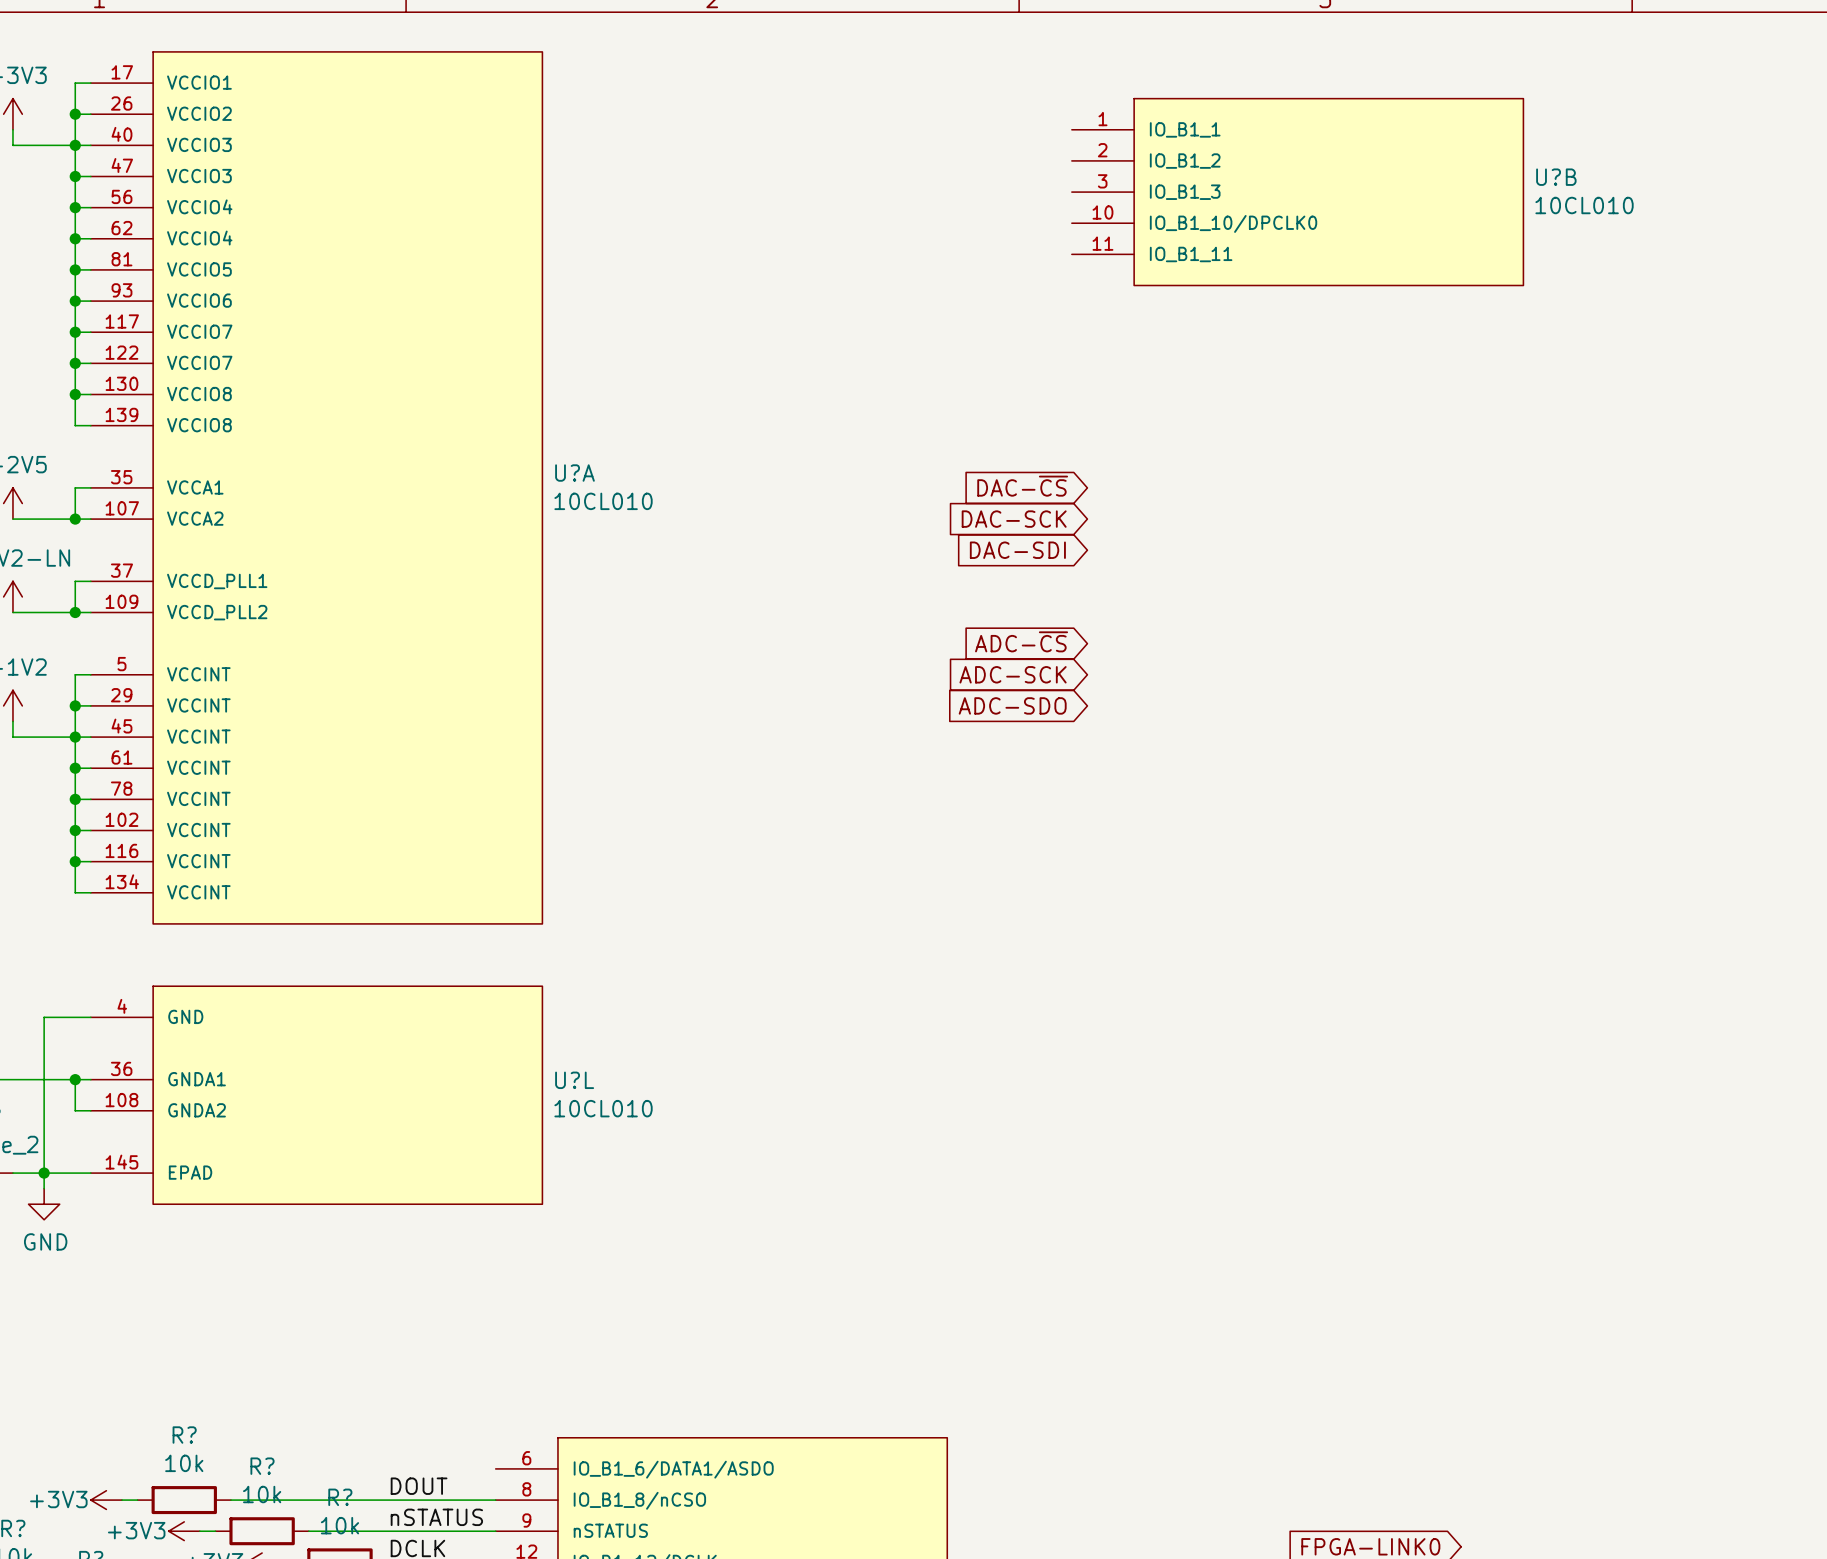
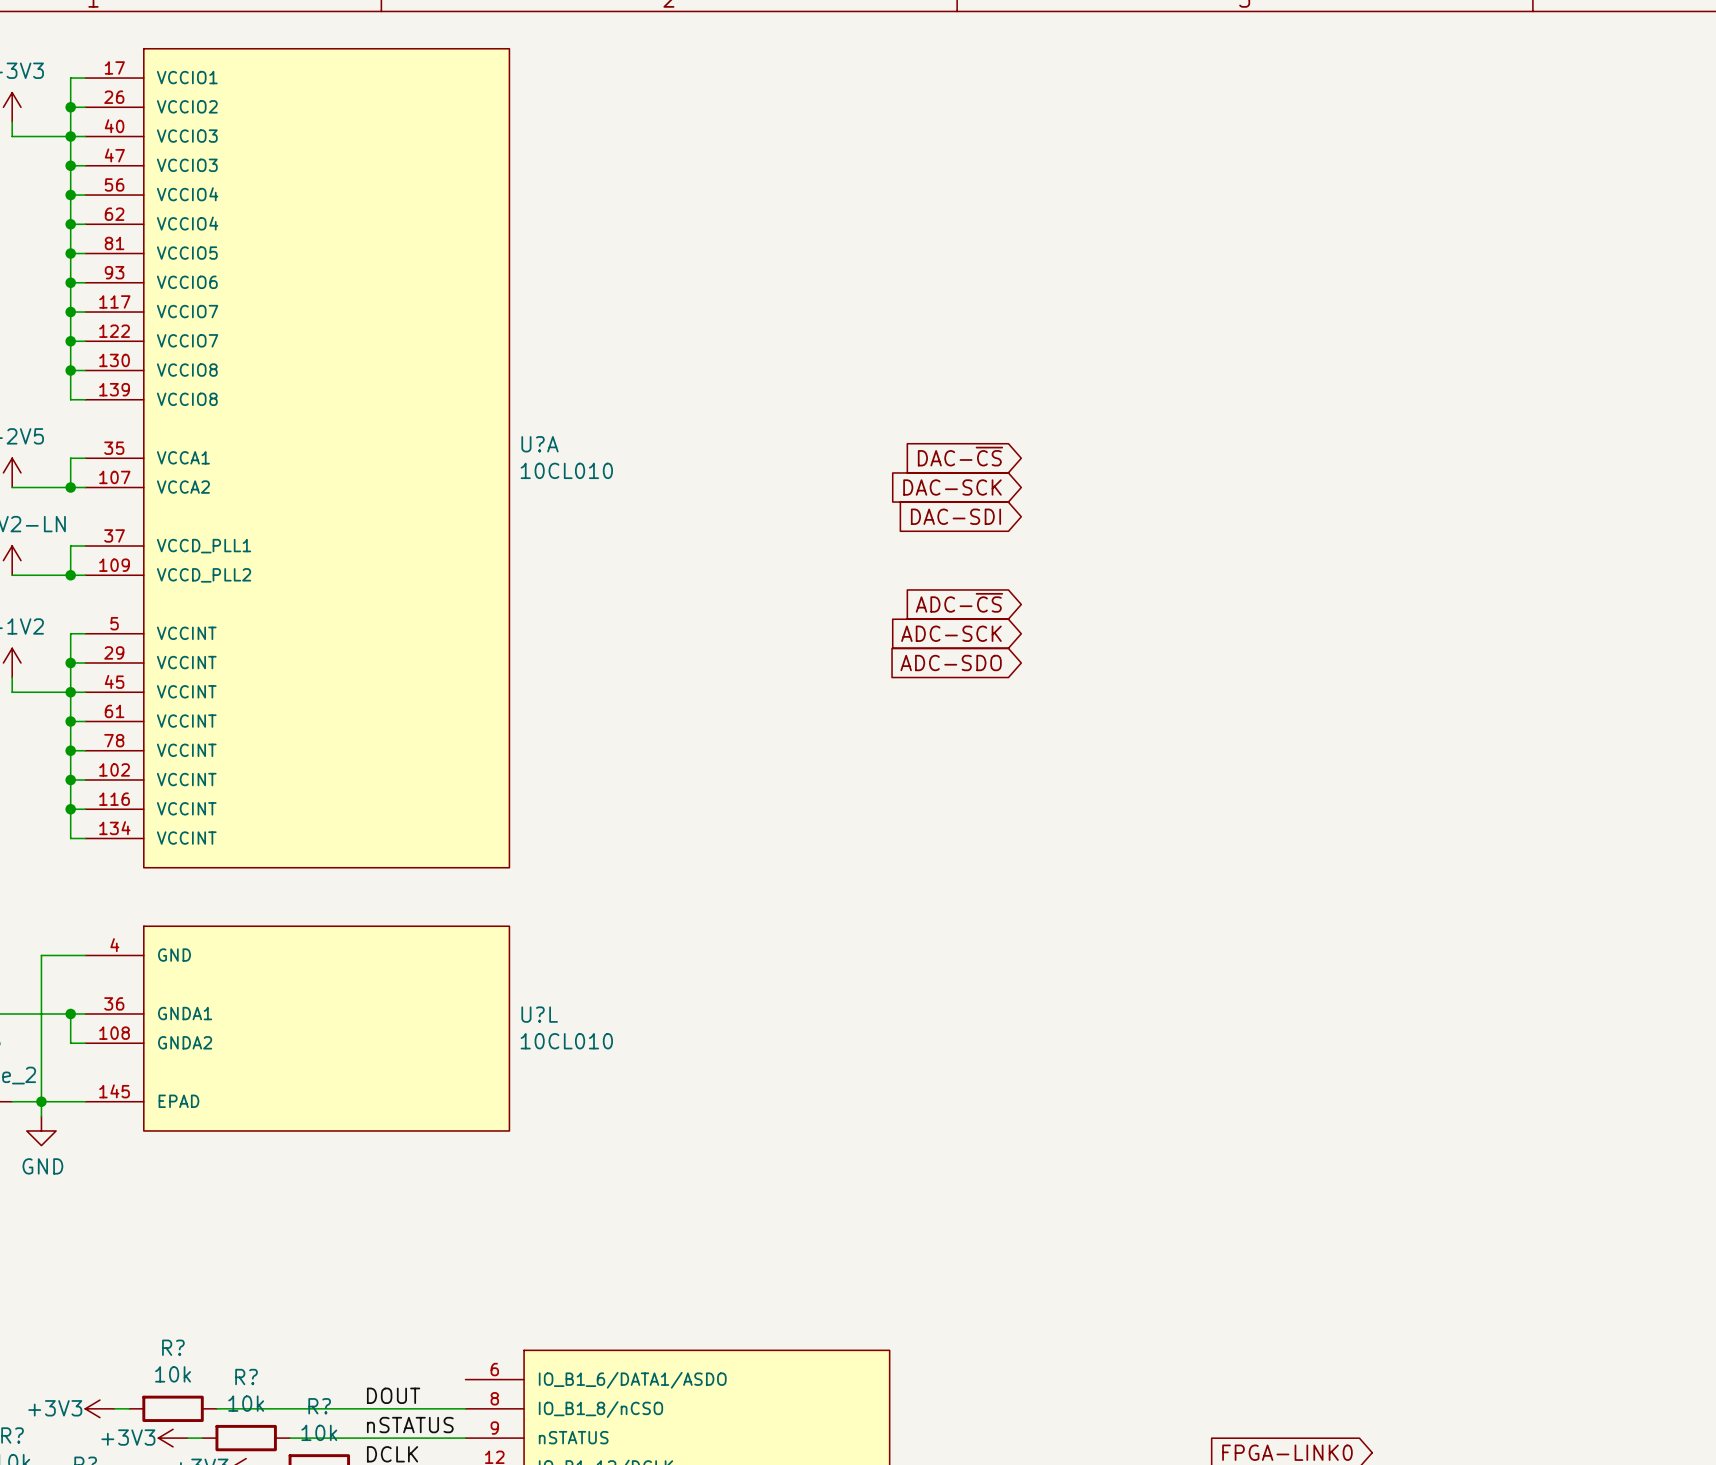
U?B: 10CL010 (1297, 192) -> none

